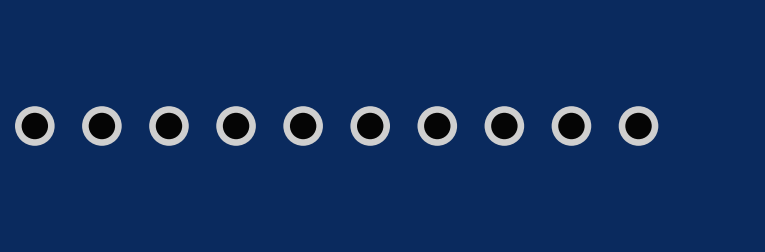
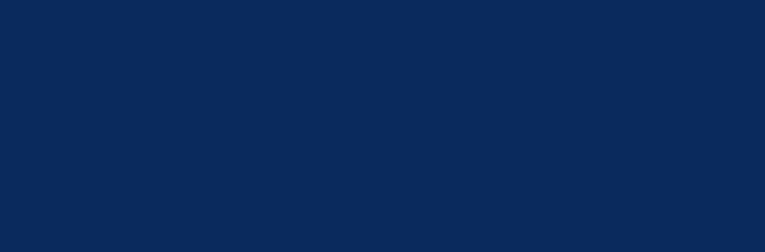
part: (336, 126) -> none

